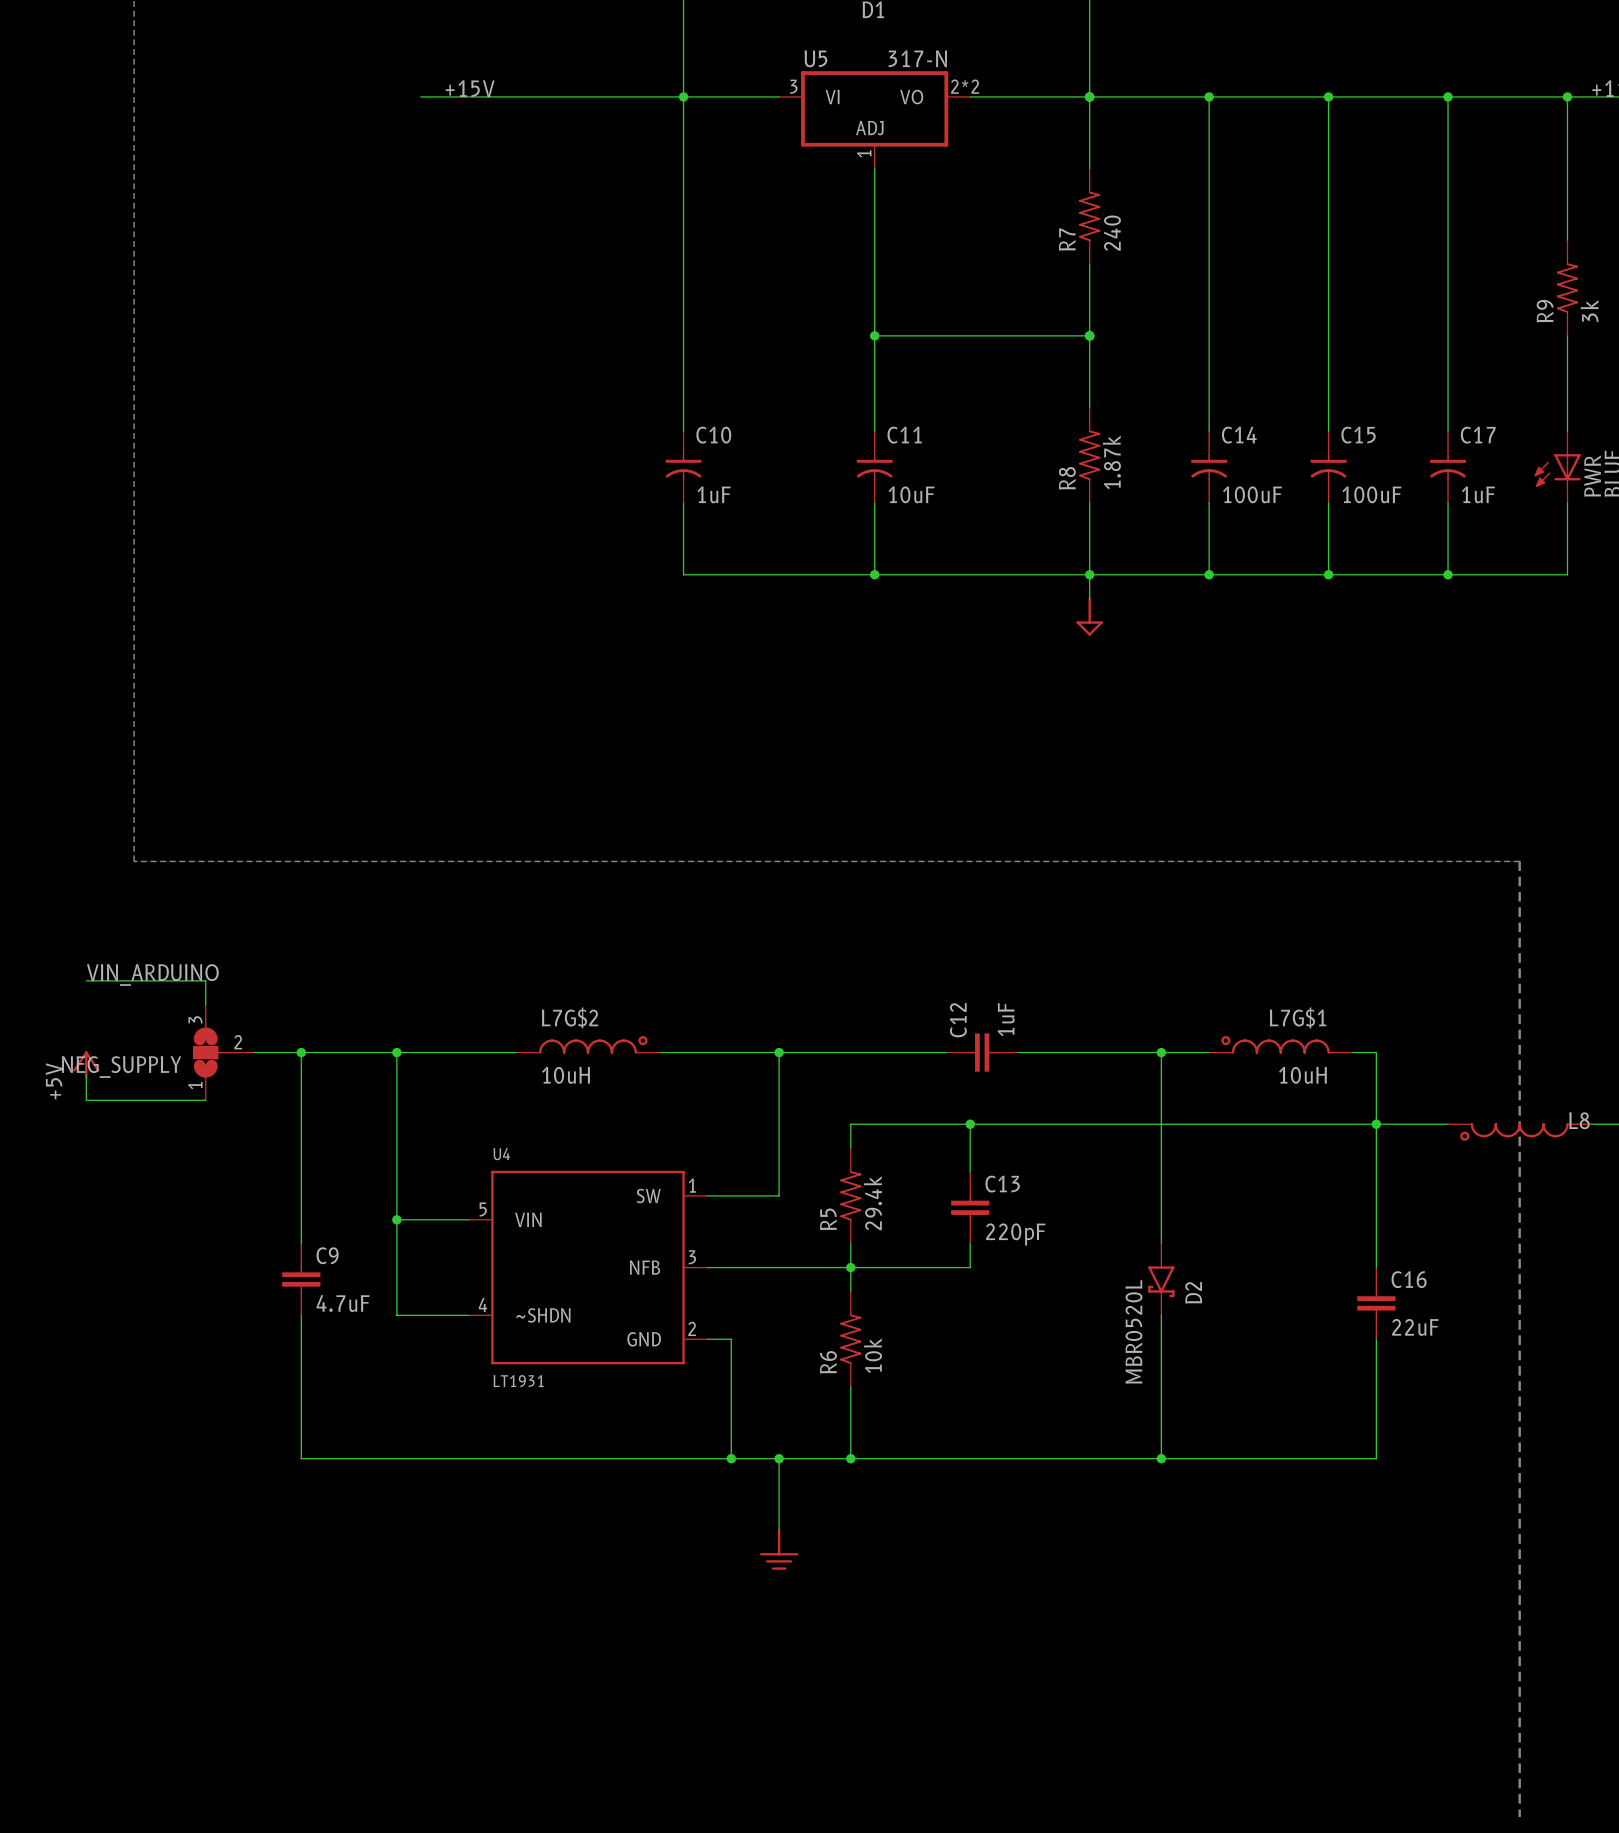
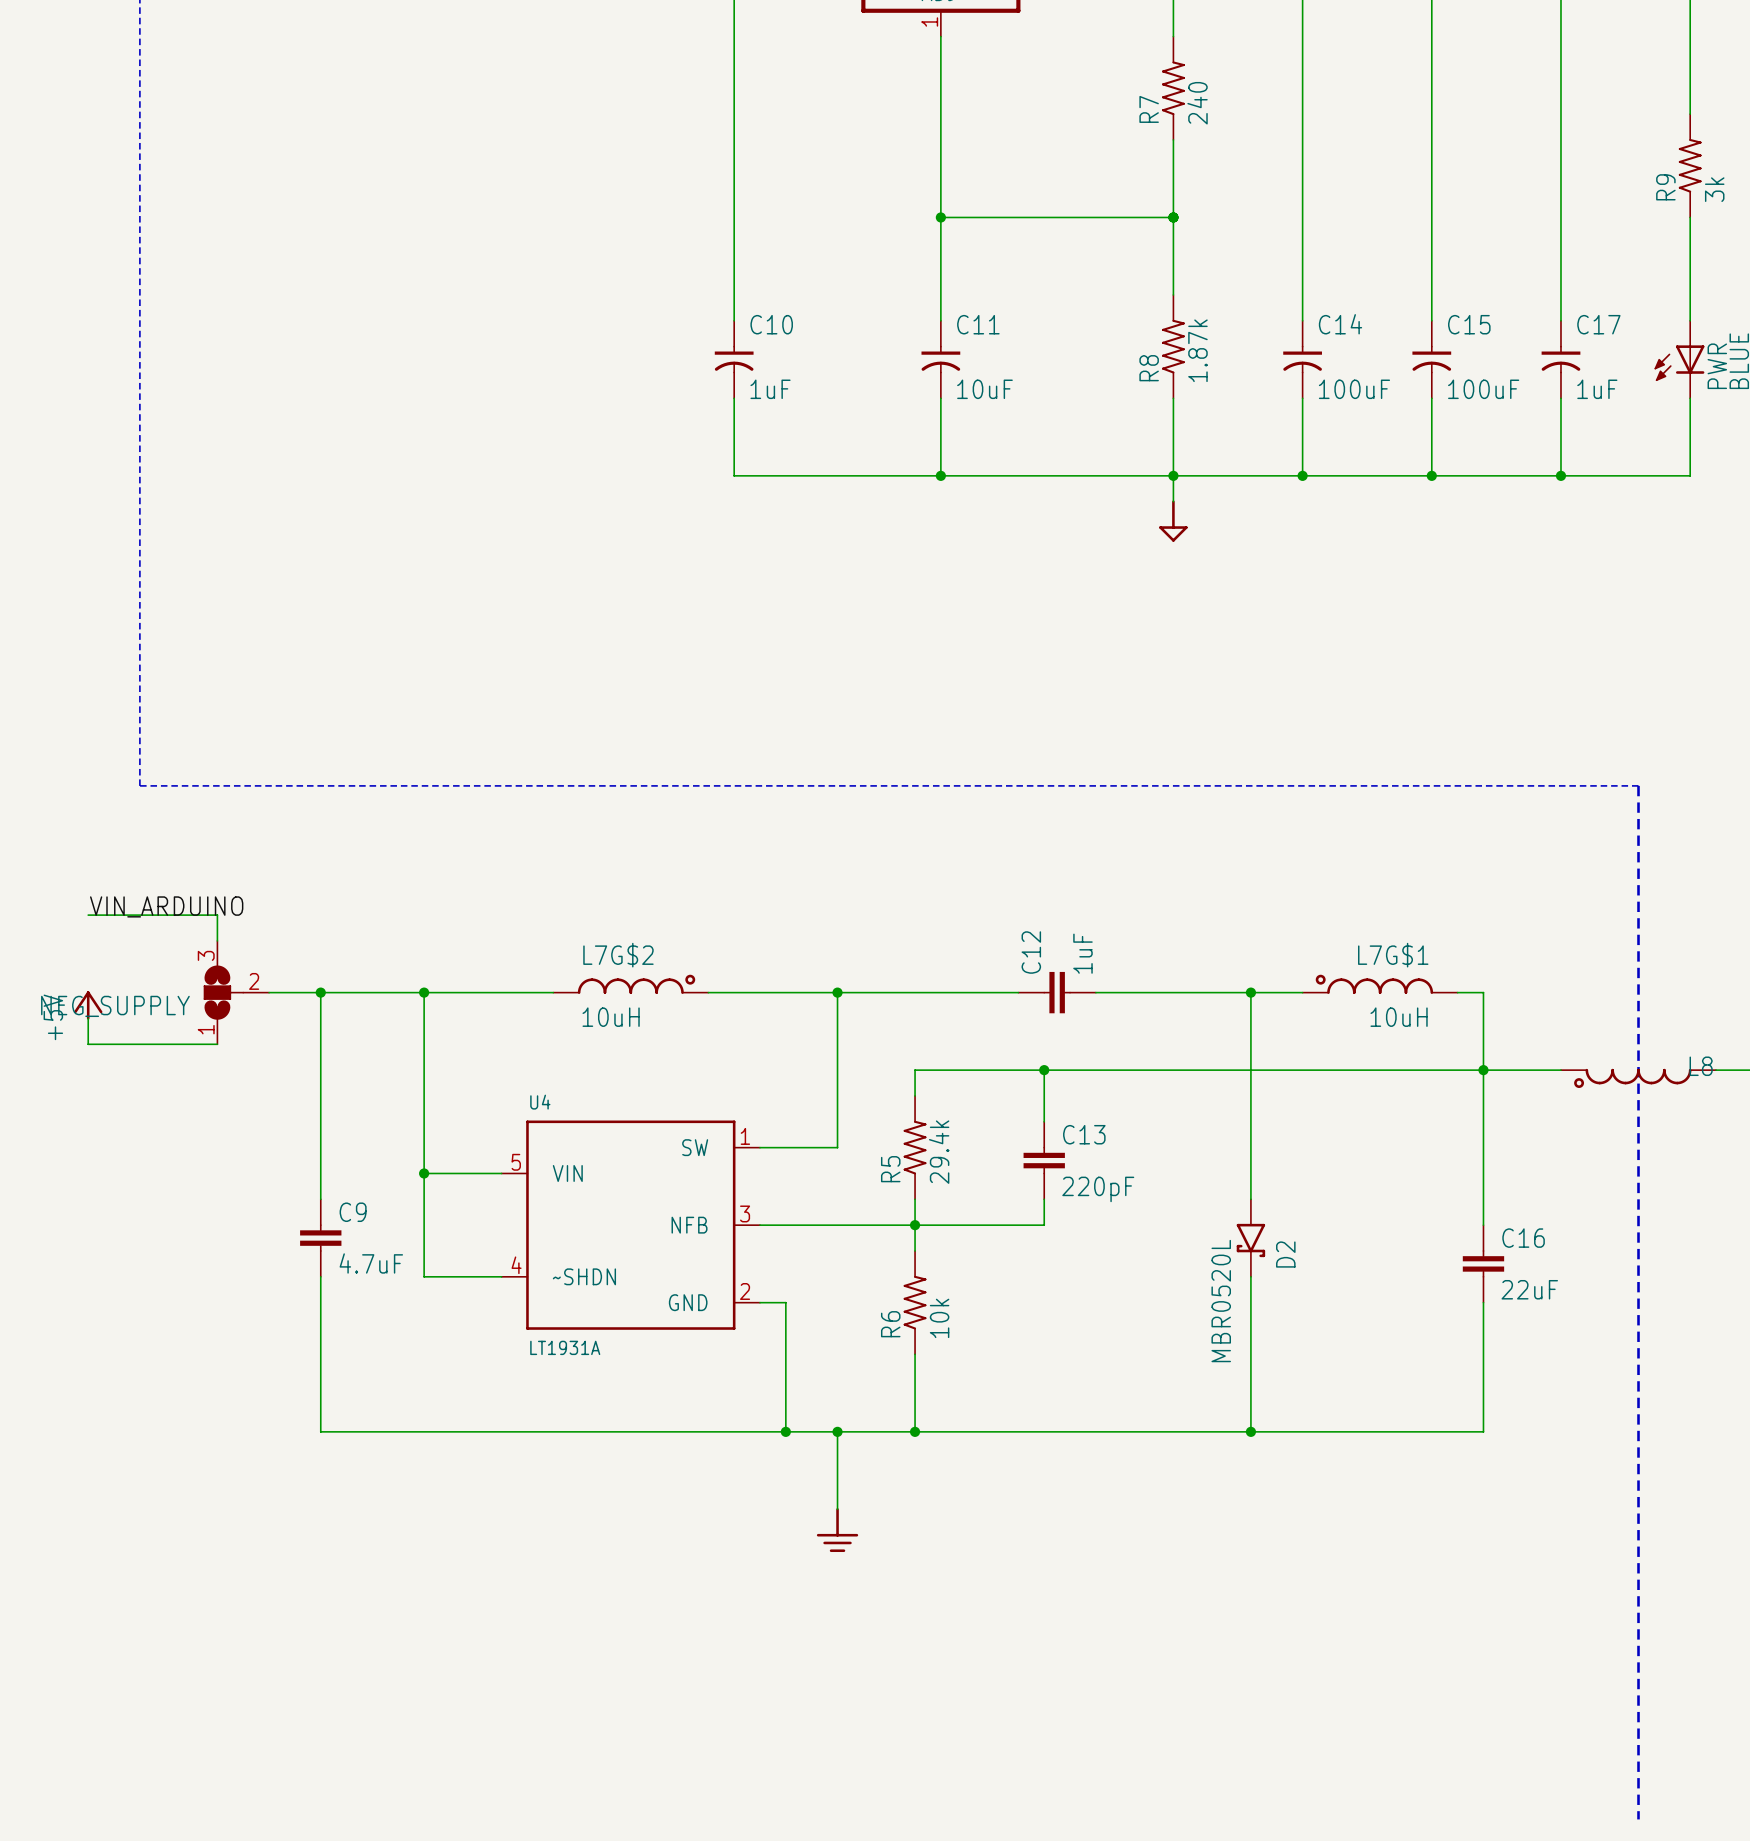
U4 value: LT1931 (518, 1381) -> LT1931A (565, 1347)

